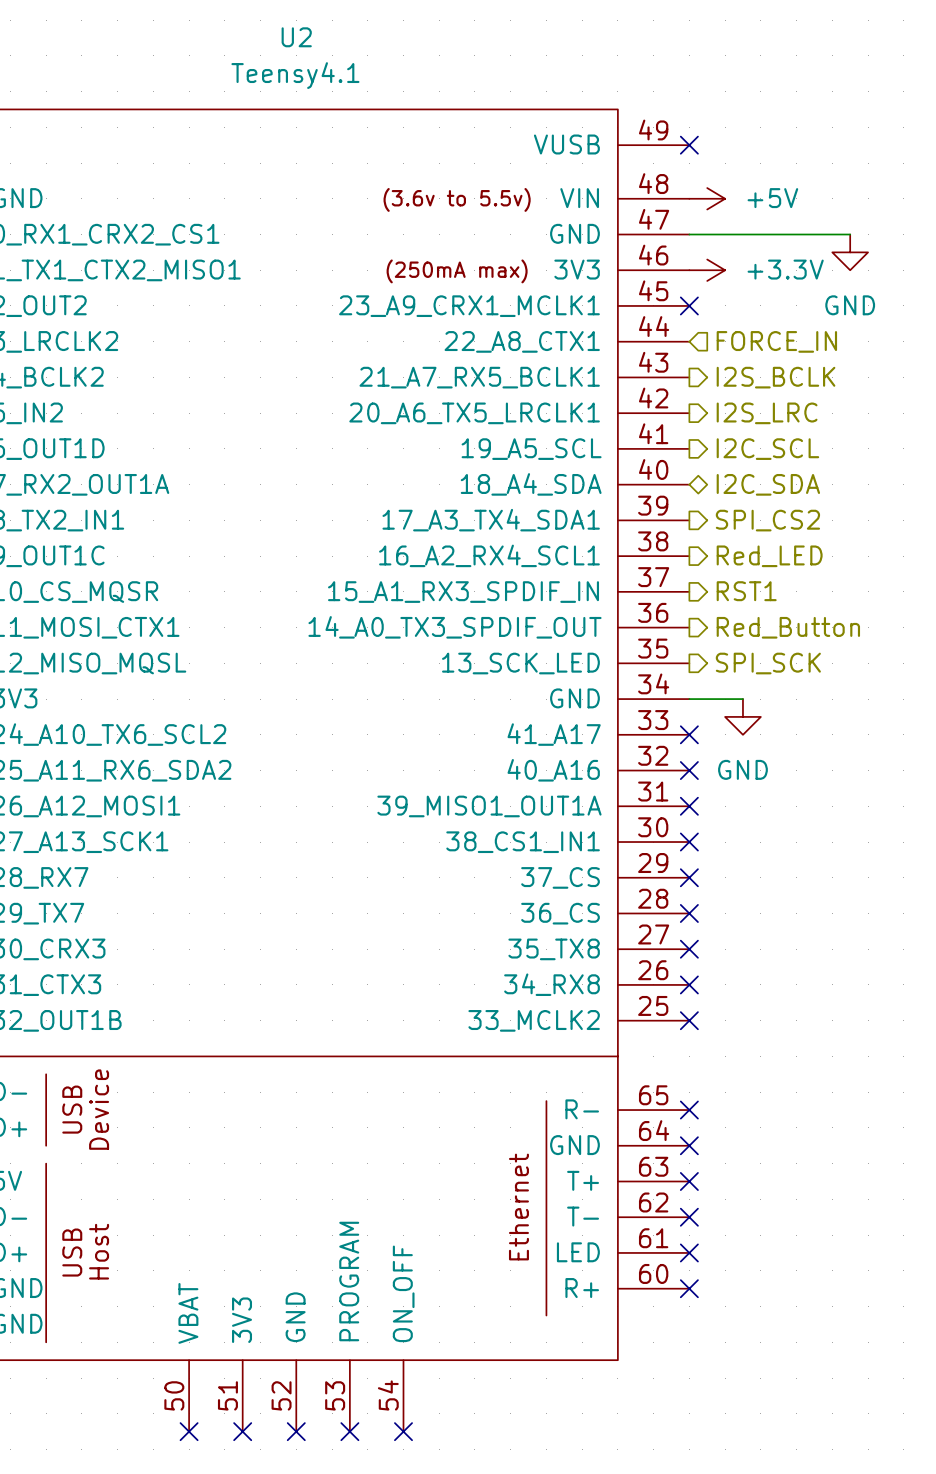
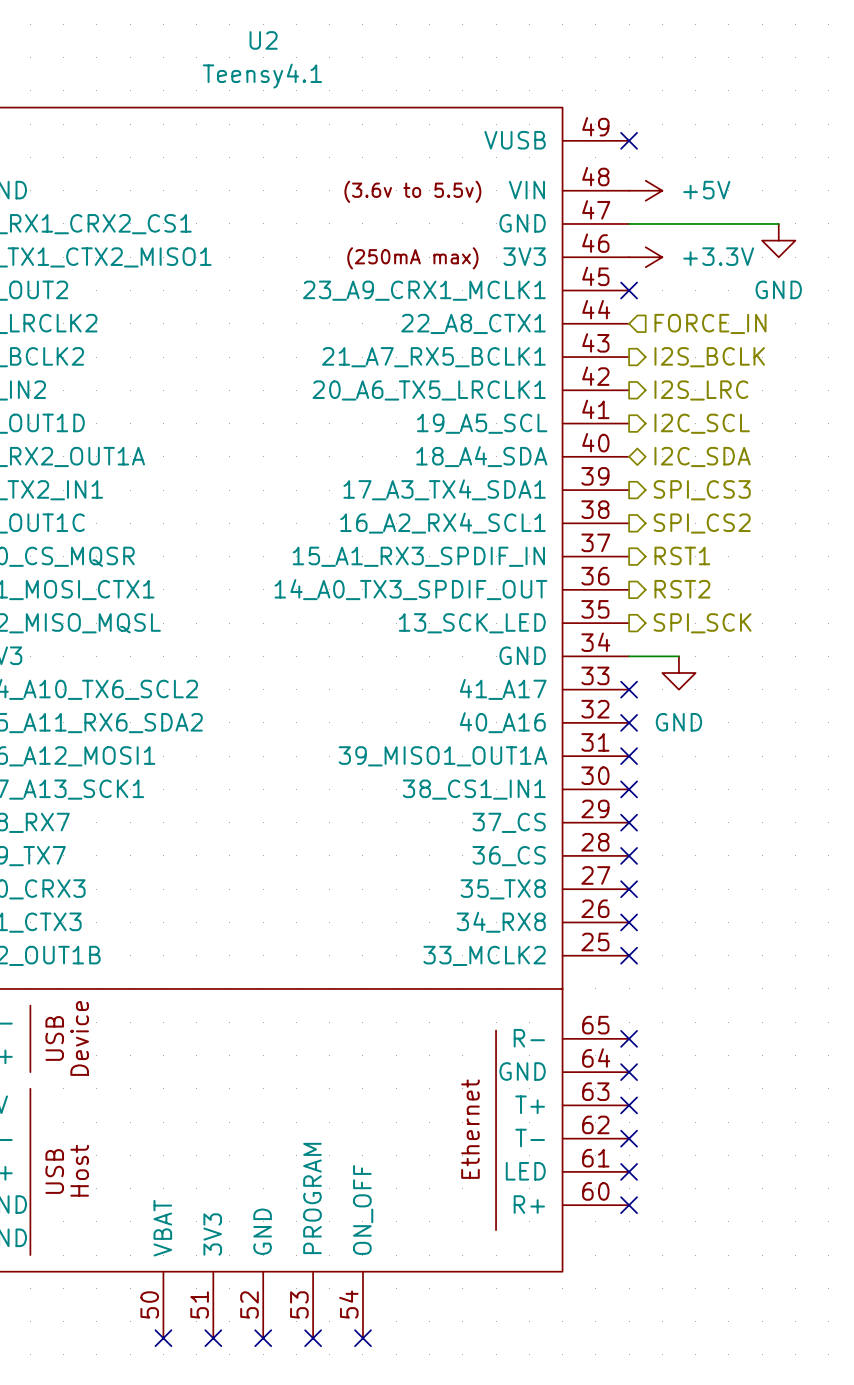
hierarchical label: SPI_CS2 (767, 520) -> SPI_CS3 (702, 490)
hierarchical label: Red_LED (769, 556) -> SPI_CS2 (702, 523)
hierarchical label: Red_Button (788, 627) -> RST2 (682, 589)

